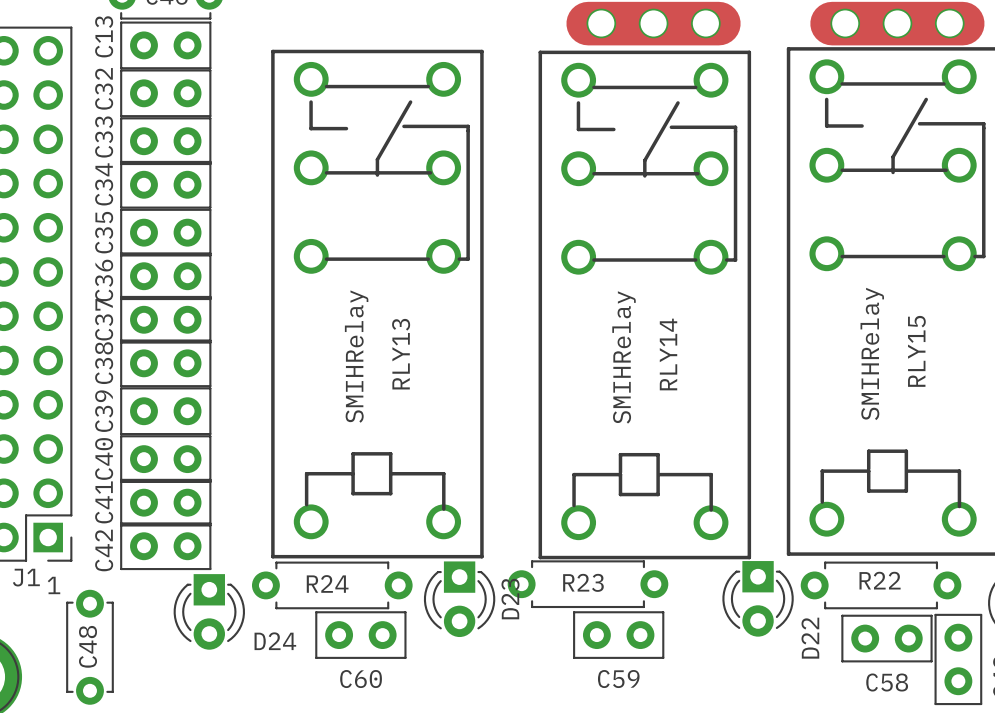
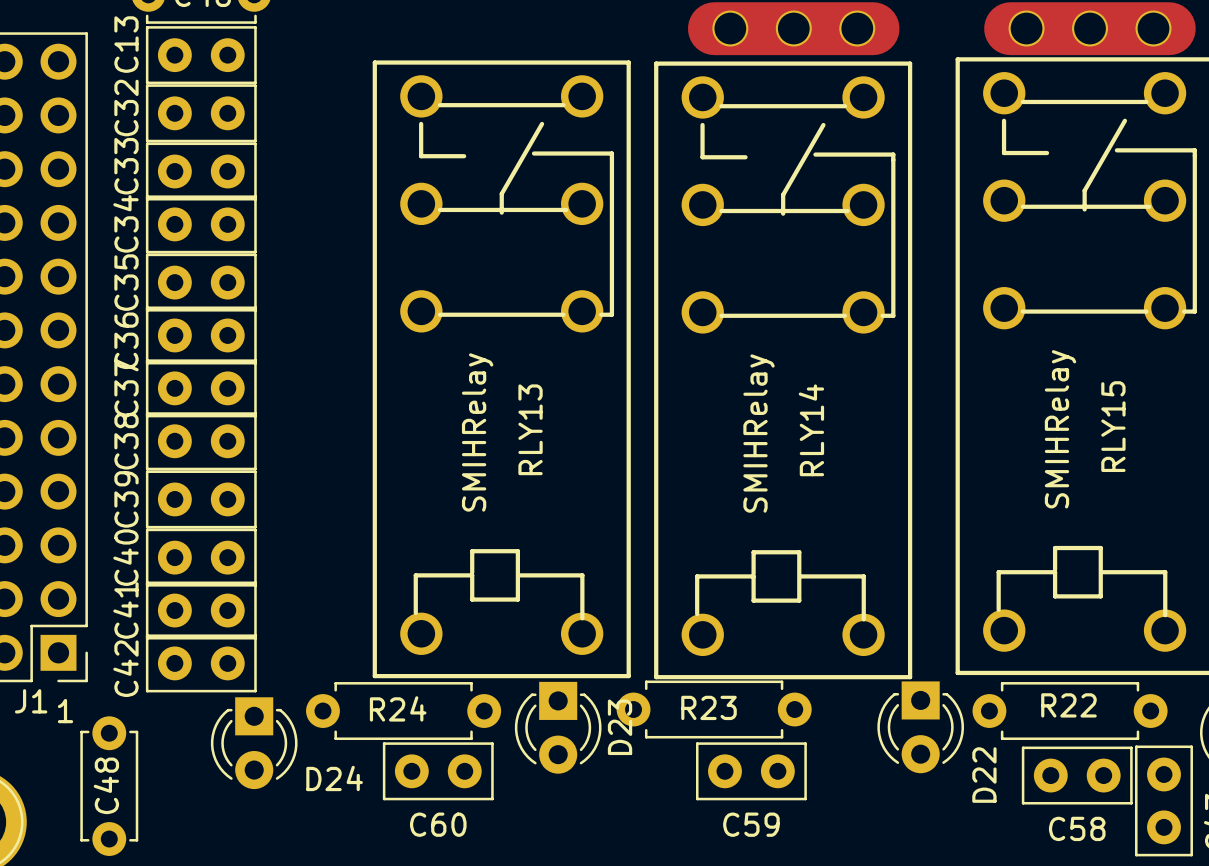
RLY13 position: (377, 304) -> (501, 369)

